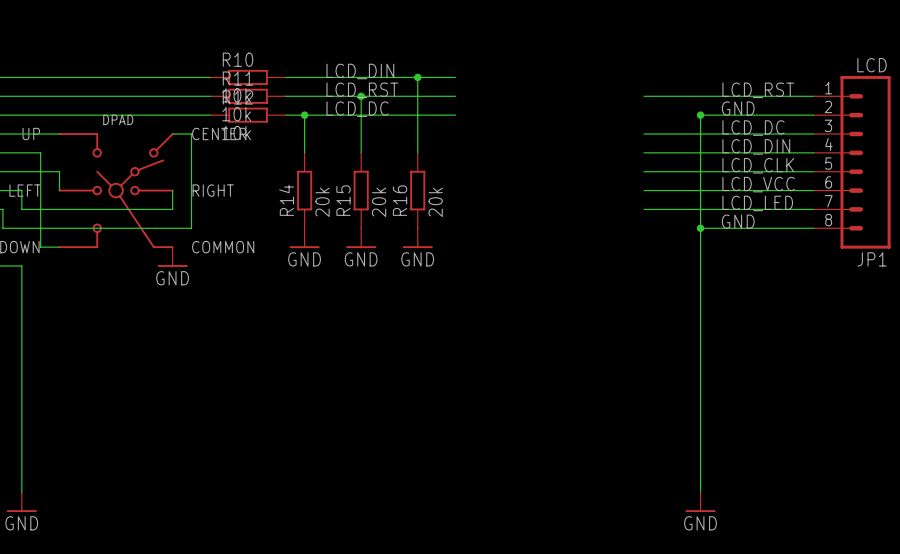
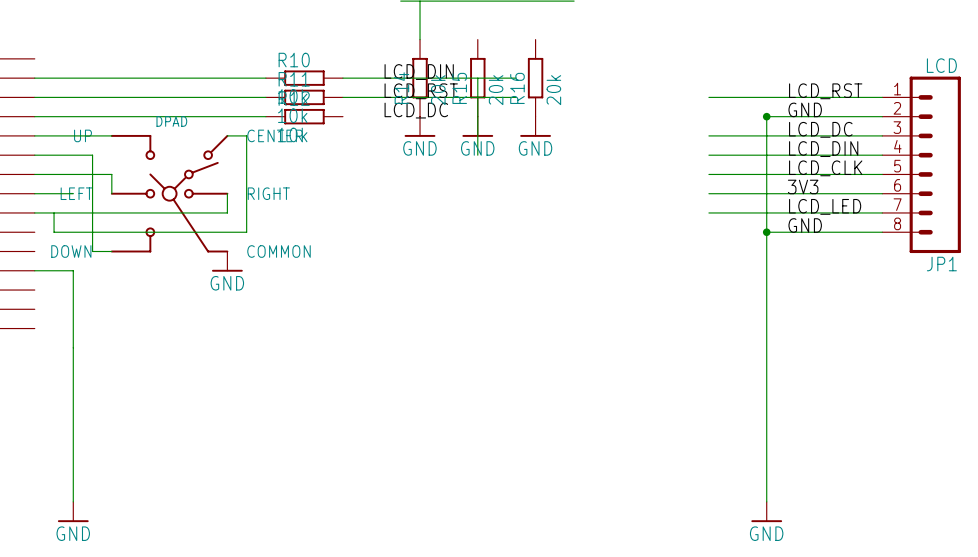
junction: (417, 77) -> none
junction: (361, 96) -> none
wire: (285, 115) (455, 115) -> (400, 1) (574, 1)
wire: (304, 115) (304, 152) -> (420, 1) (420, 39)
junction: (304, 115) -> none
power symbol: none -> GND (420, 126)
power symbol: none -> GND (477, 126)
power symbol: none -> GND (535, 126)
label: LCD_VCC (758, 184) -> 3V3 (803, 186)
wire: (21, 190) (21, 209) -> (54, 212) (73, 212)
R14 position: (304, 190) -> (420, 78)
R15 position: (361, 190) -> (477, 78)
R16 position: (417, 190) -> (535, 78)
power symbol: GND (304, 238) -> none
power symbol: GND (361, 238) -> none
power symbol: GND (417, 238) -> none

